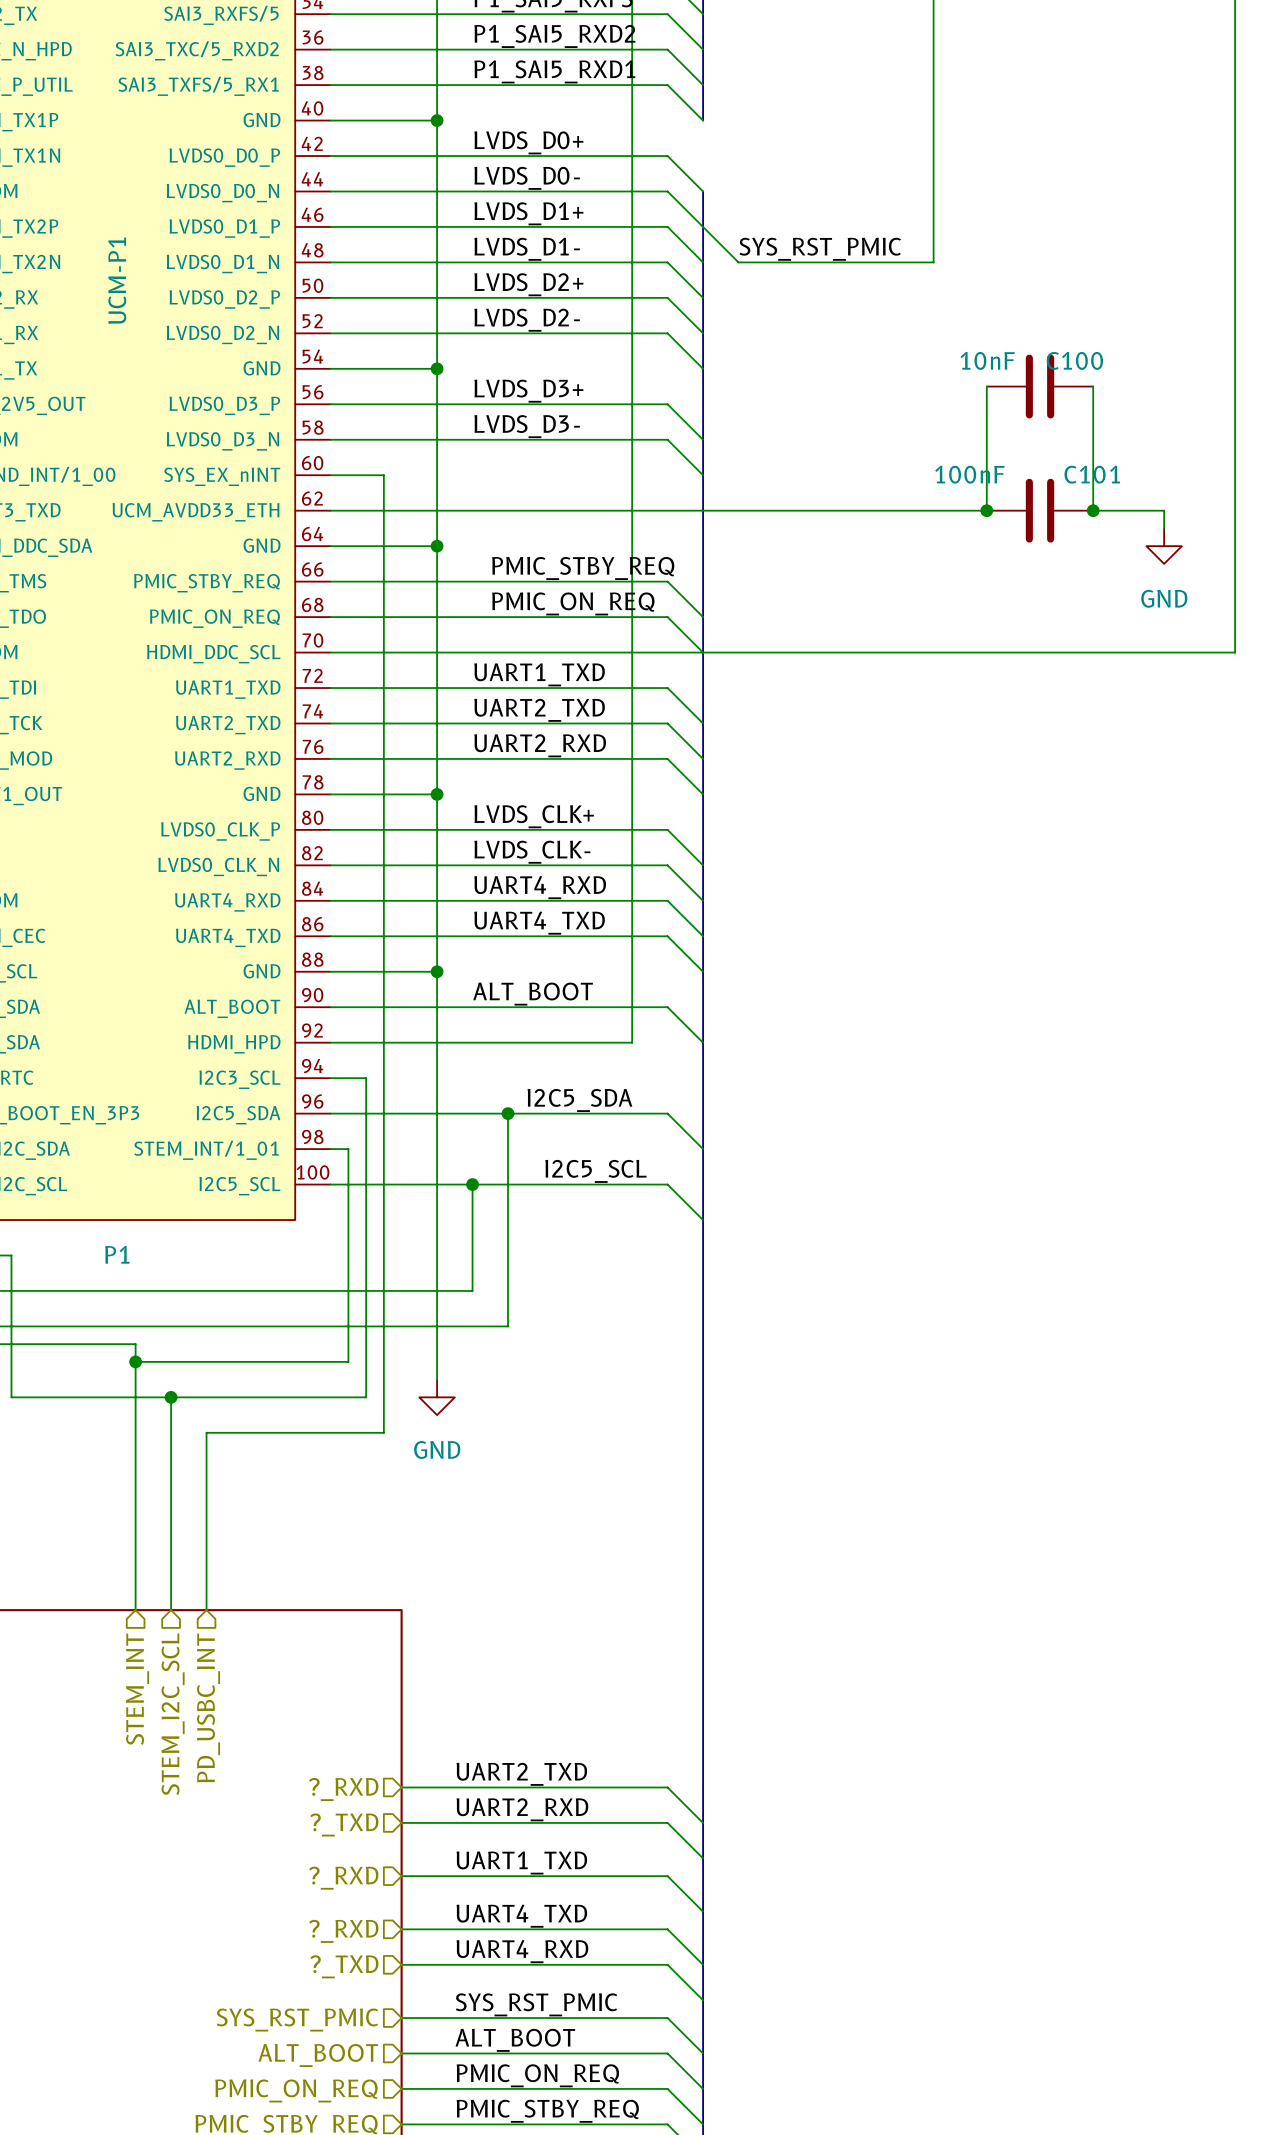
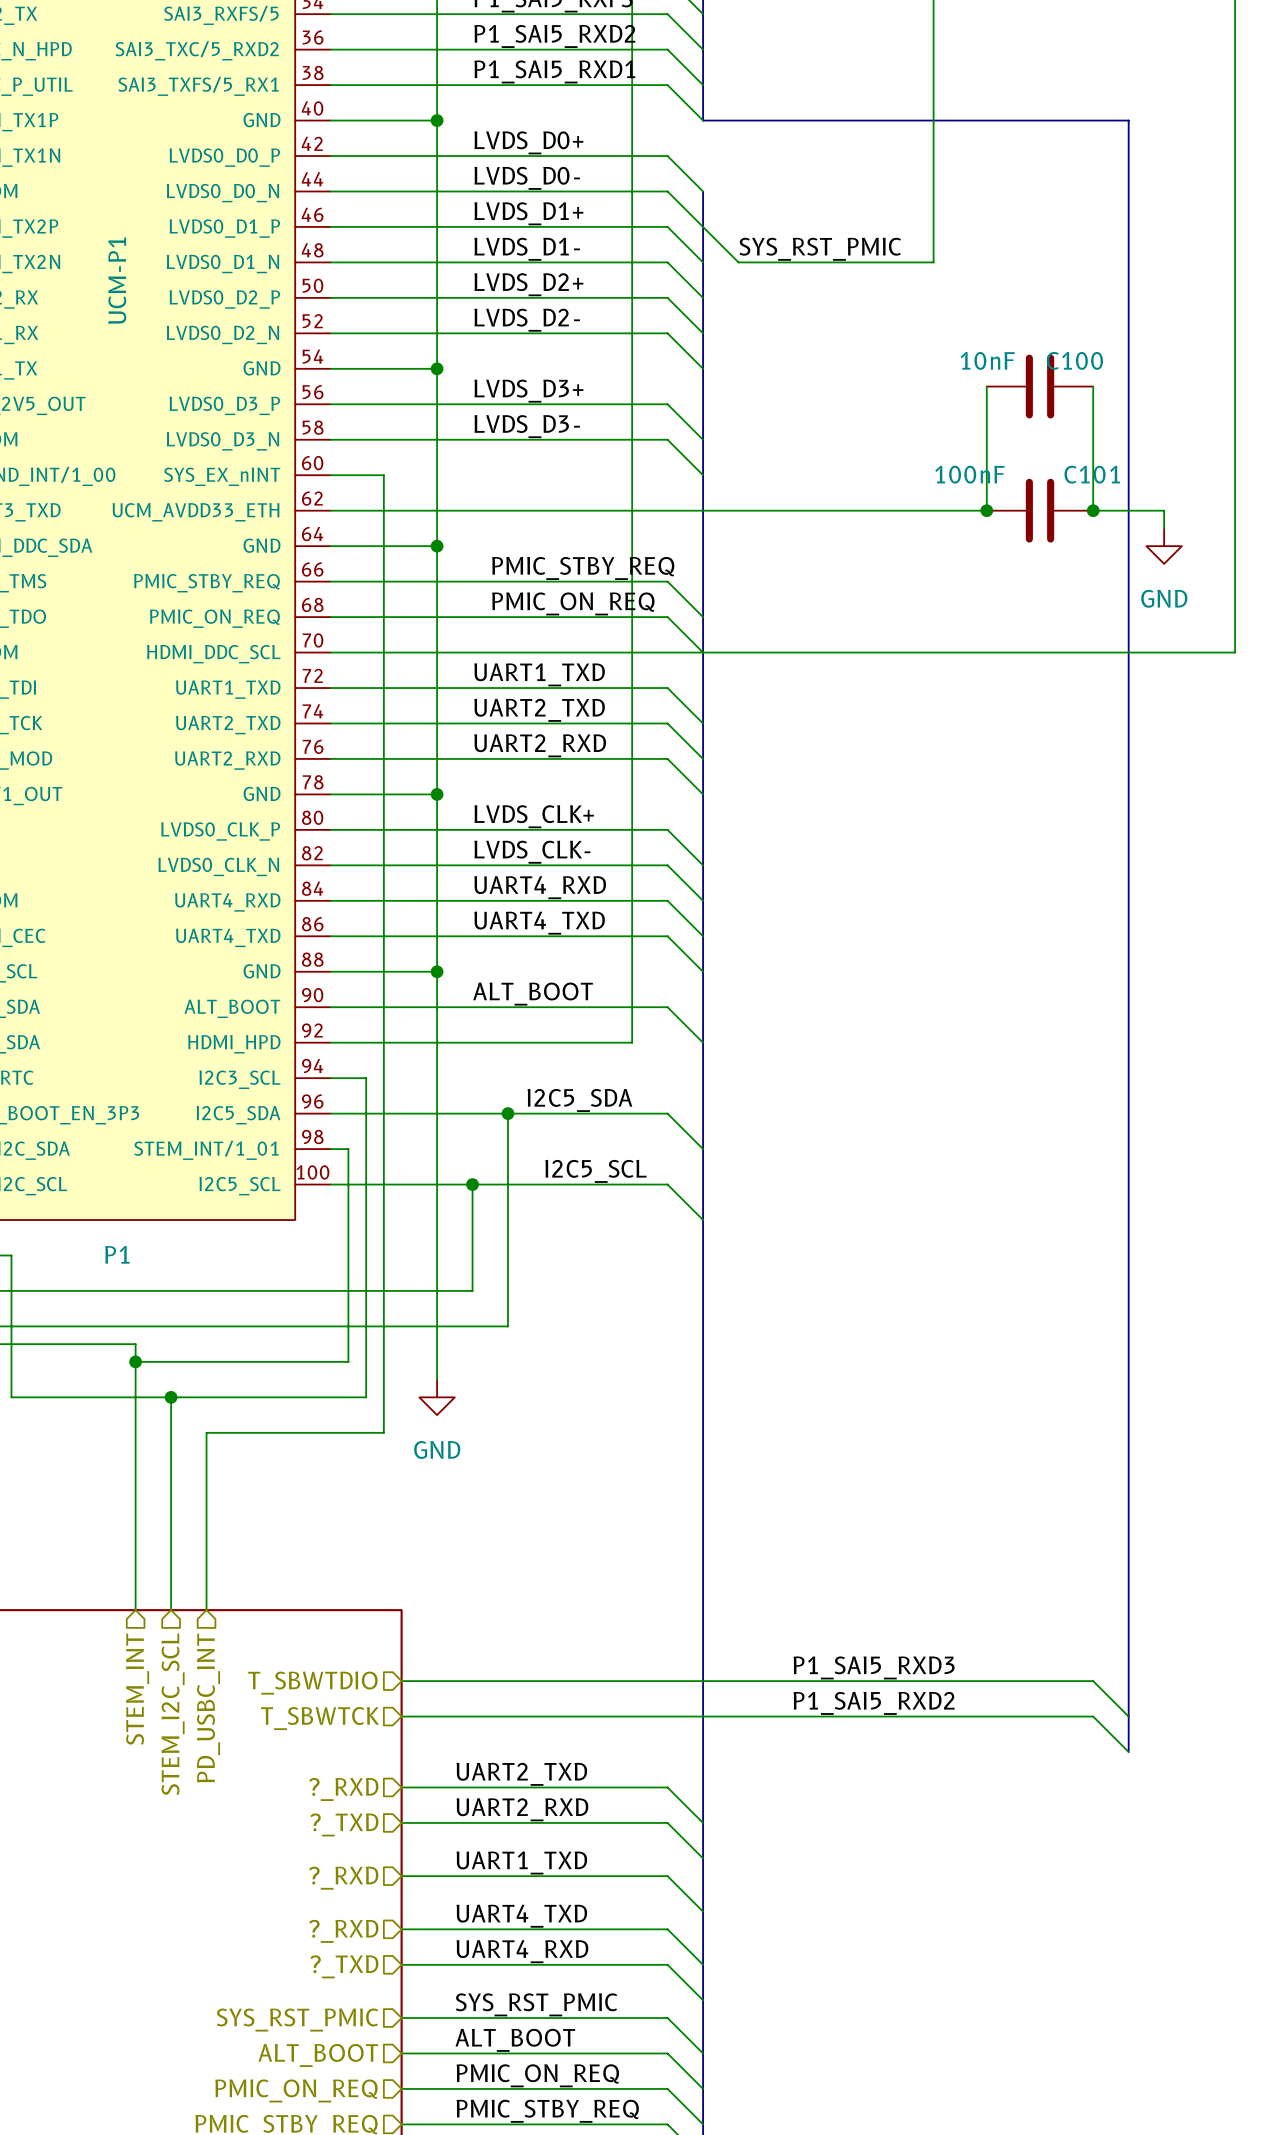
bus: none -> (703, 120) (1128, 120) (1128, 1752)
label: none -> P1_SAI5_RXD3 (874, 1667)
wire: none -> (401, 1681) (1093, 1681) (1128, 1716)
hierarchical label: none -> T_SBWTDIO (312, 1683)
label: none -> P1_SAI5_RXD2 (874, 1703)
wire: none -> (401, 1716) (1093, 1716) (1128, 1752)
hierarchical label: none -> T_SBWTCK (319, 1718)

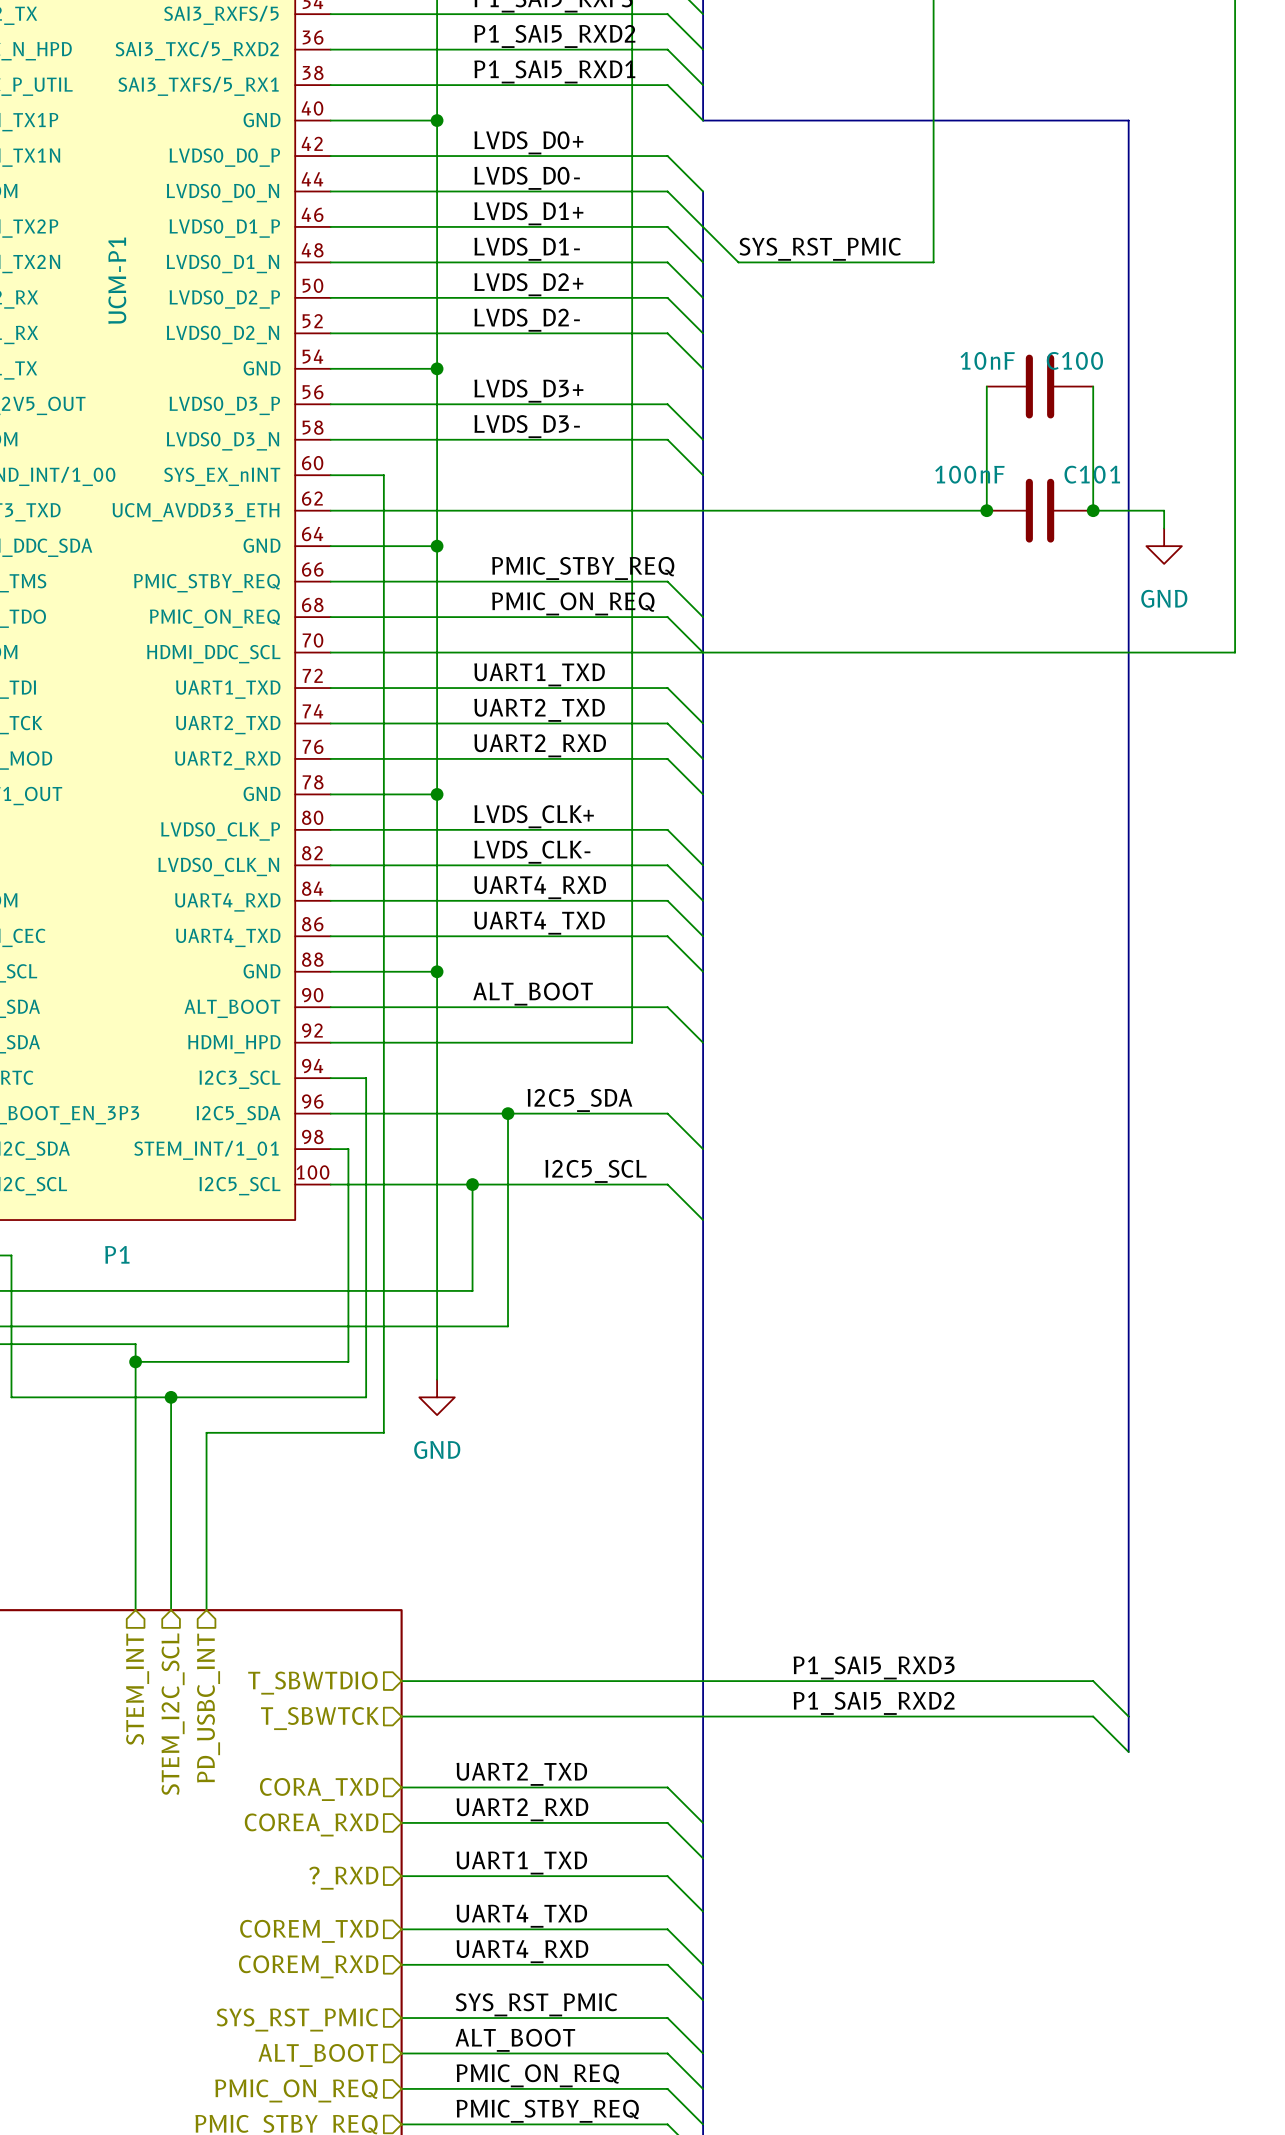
hierarchical label: ?_RXD (343, 1789) -> CORA_TXD (319, 1789)
hierarchical label: ?_TXD (344, 1824) -> COREA_RXD (311, 1824)
hierarchical label: ?_RXD (343, 1931) -> COREM_TXD (309, 1931)
hierarchical label: ?_TXD (344, 1966) -> COREM_RXD (308, 1966)

